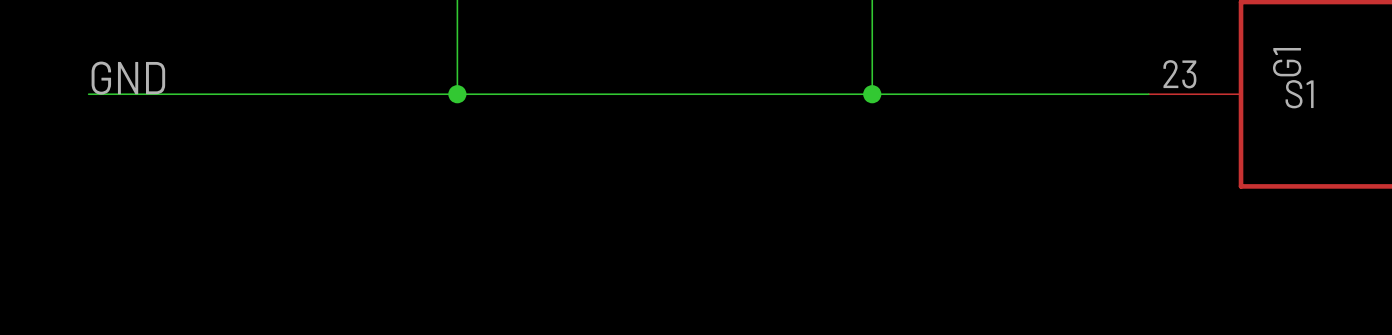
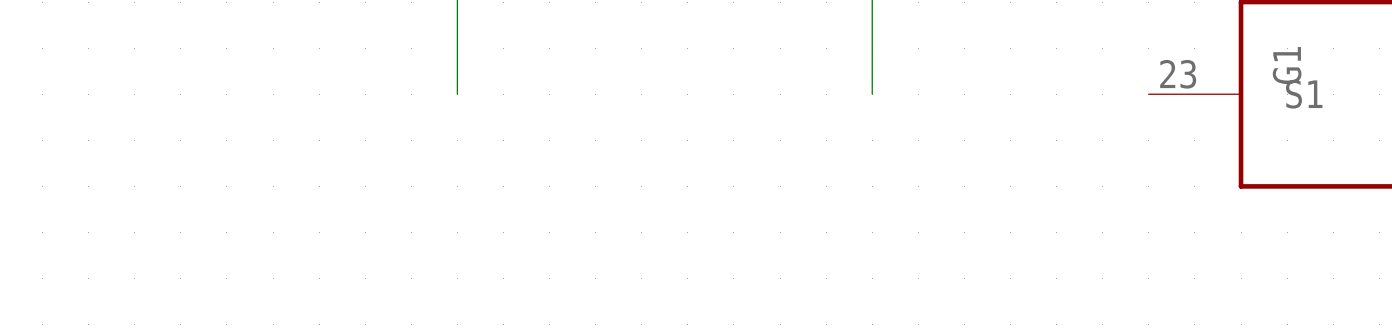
label: GND (128, 78) -> none
wire: (88, 94) (1148, 94) -> none
junction: (457, 94) -> none
junction: (872, 94) -> none

